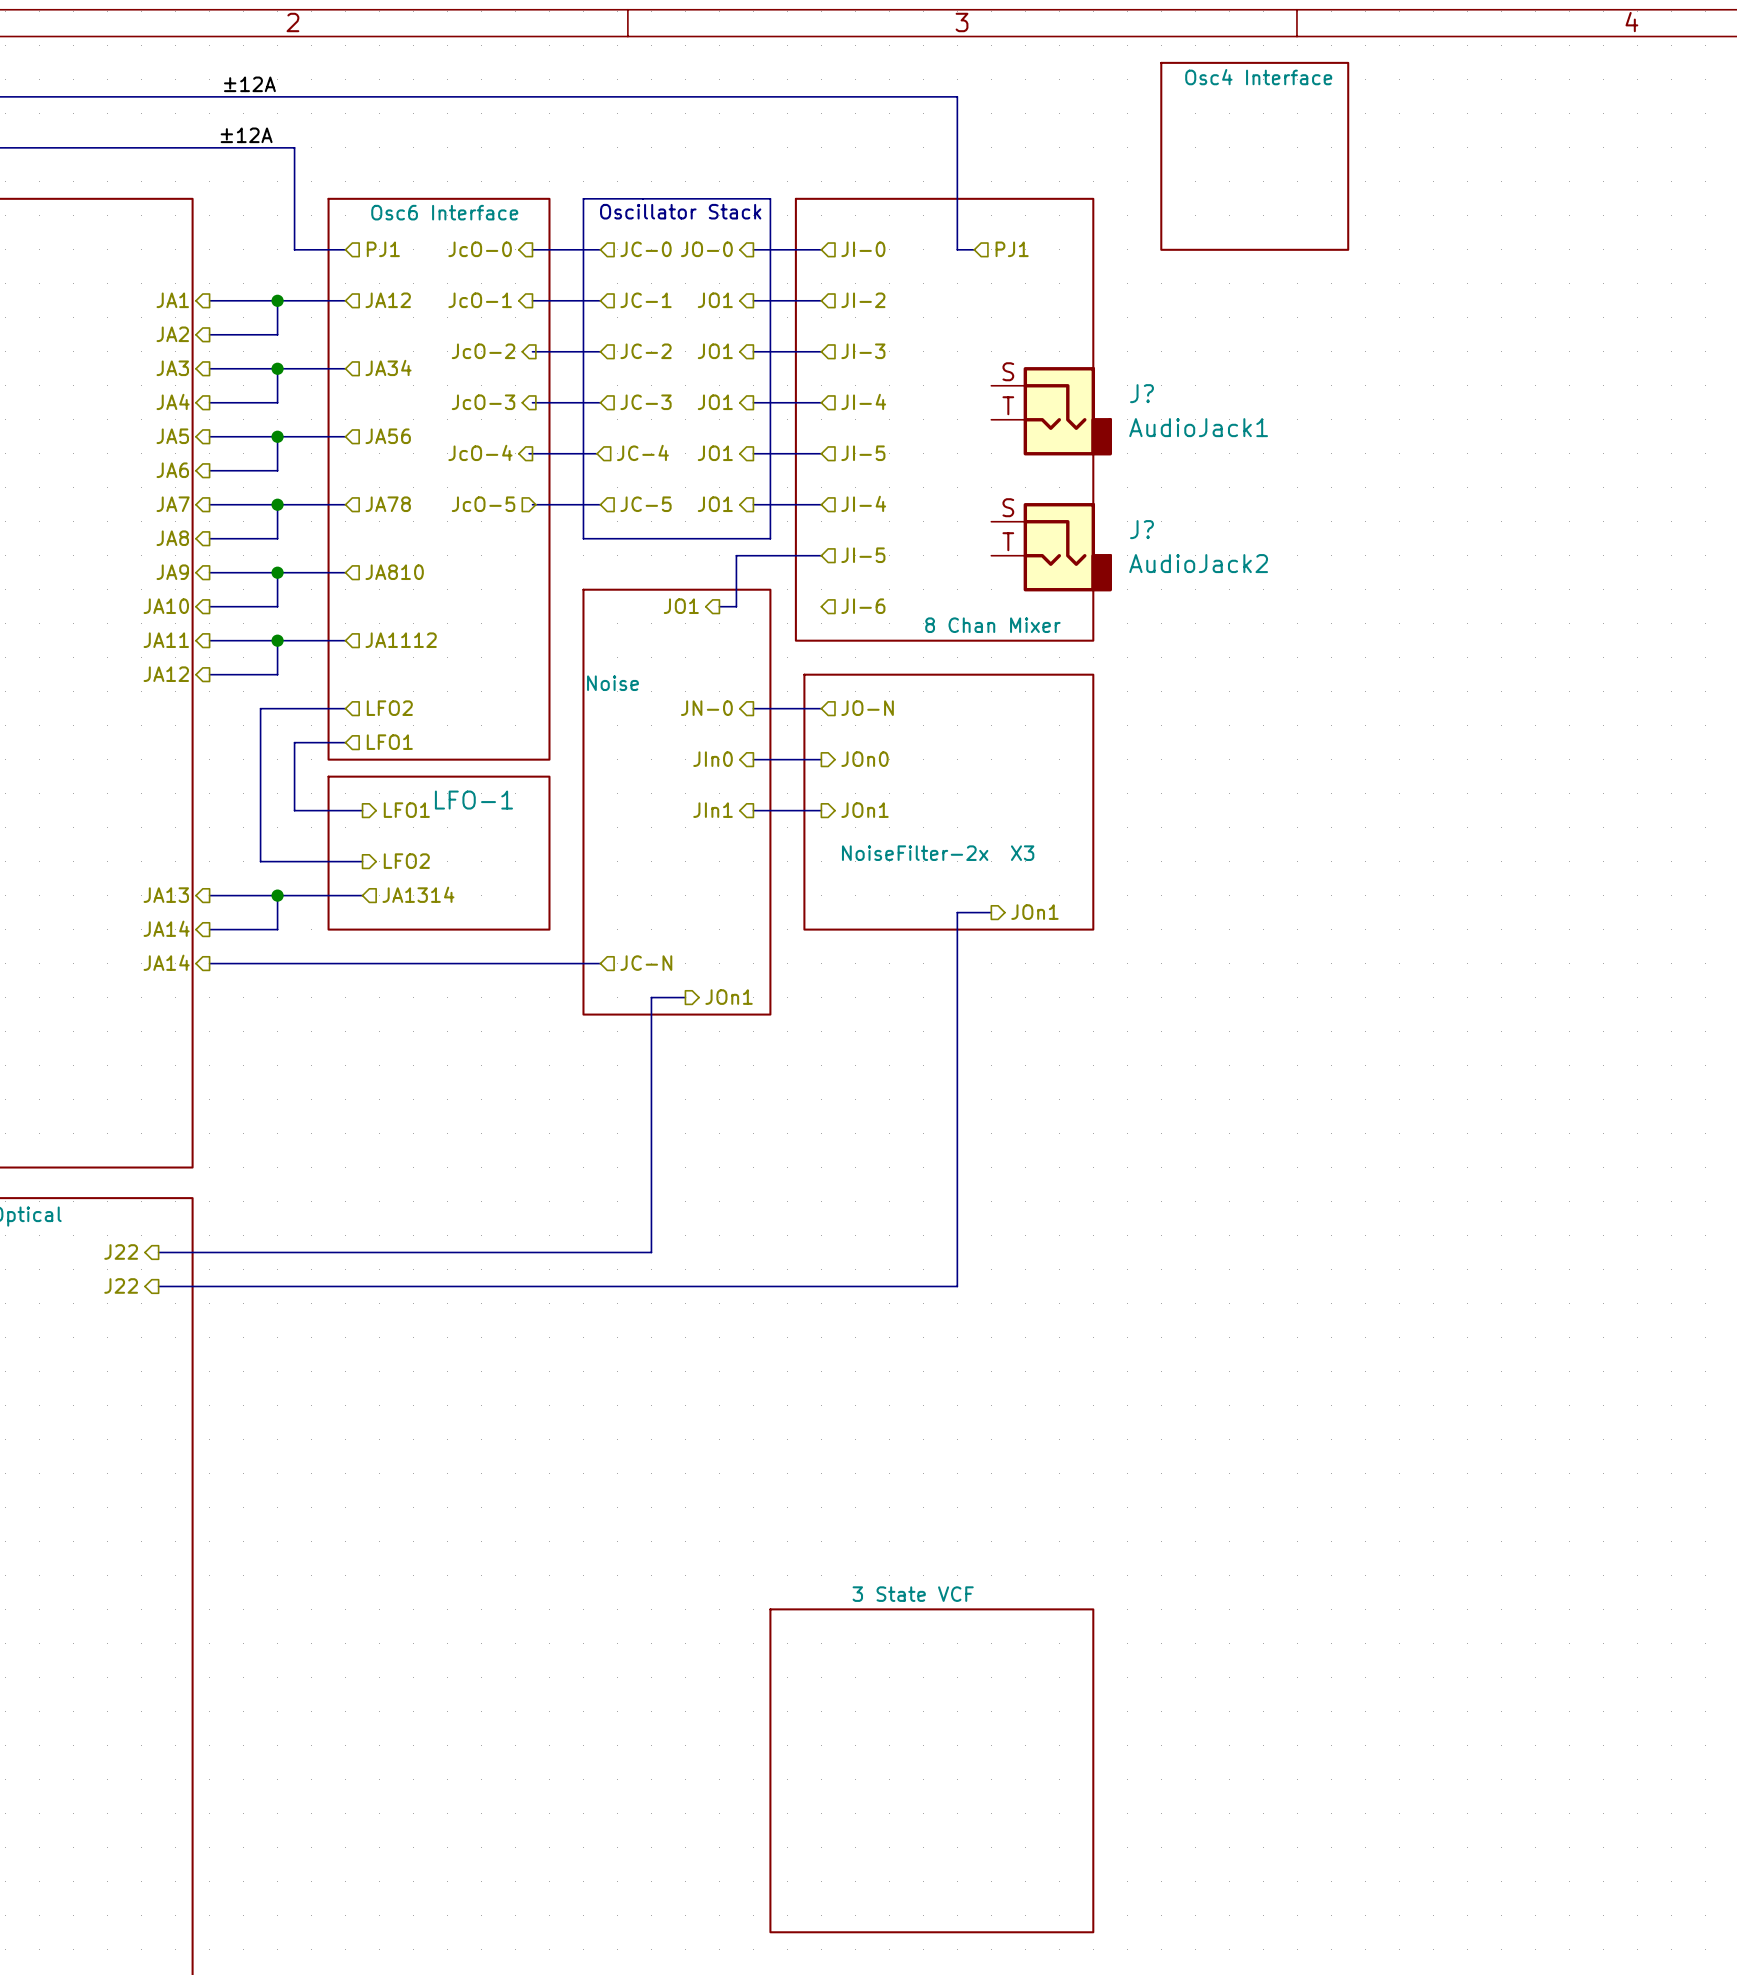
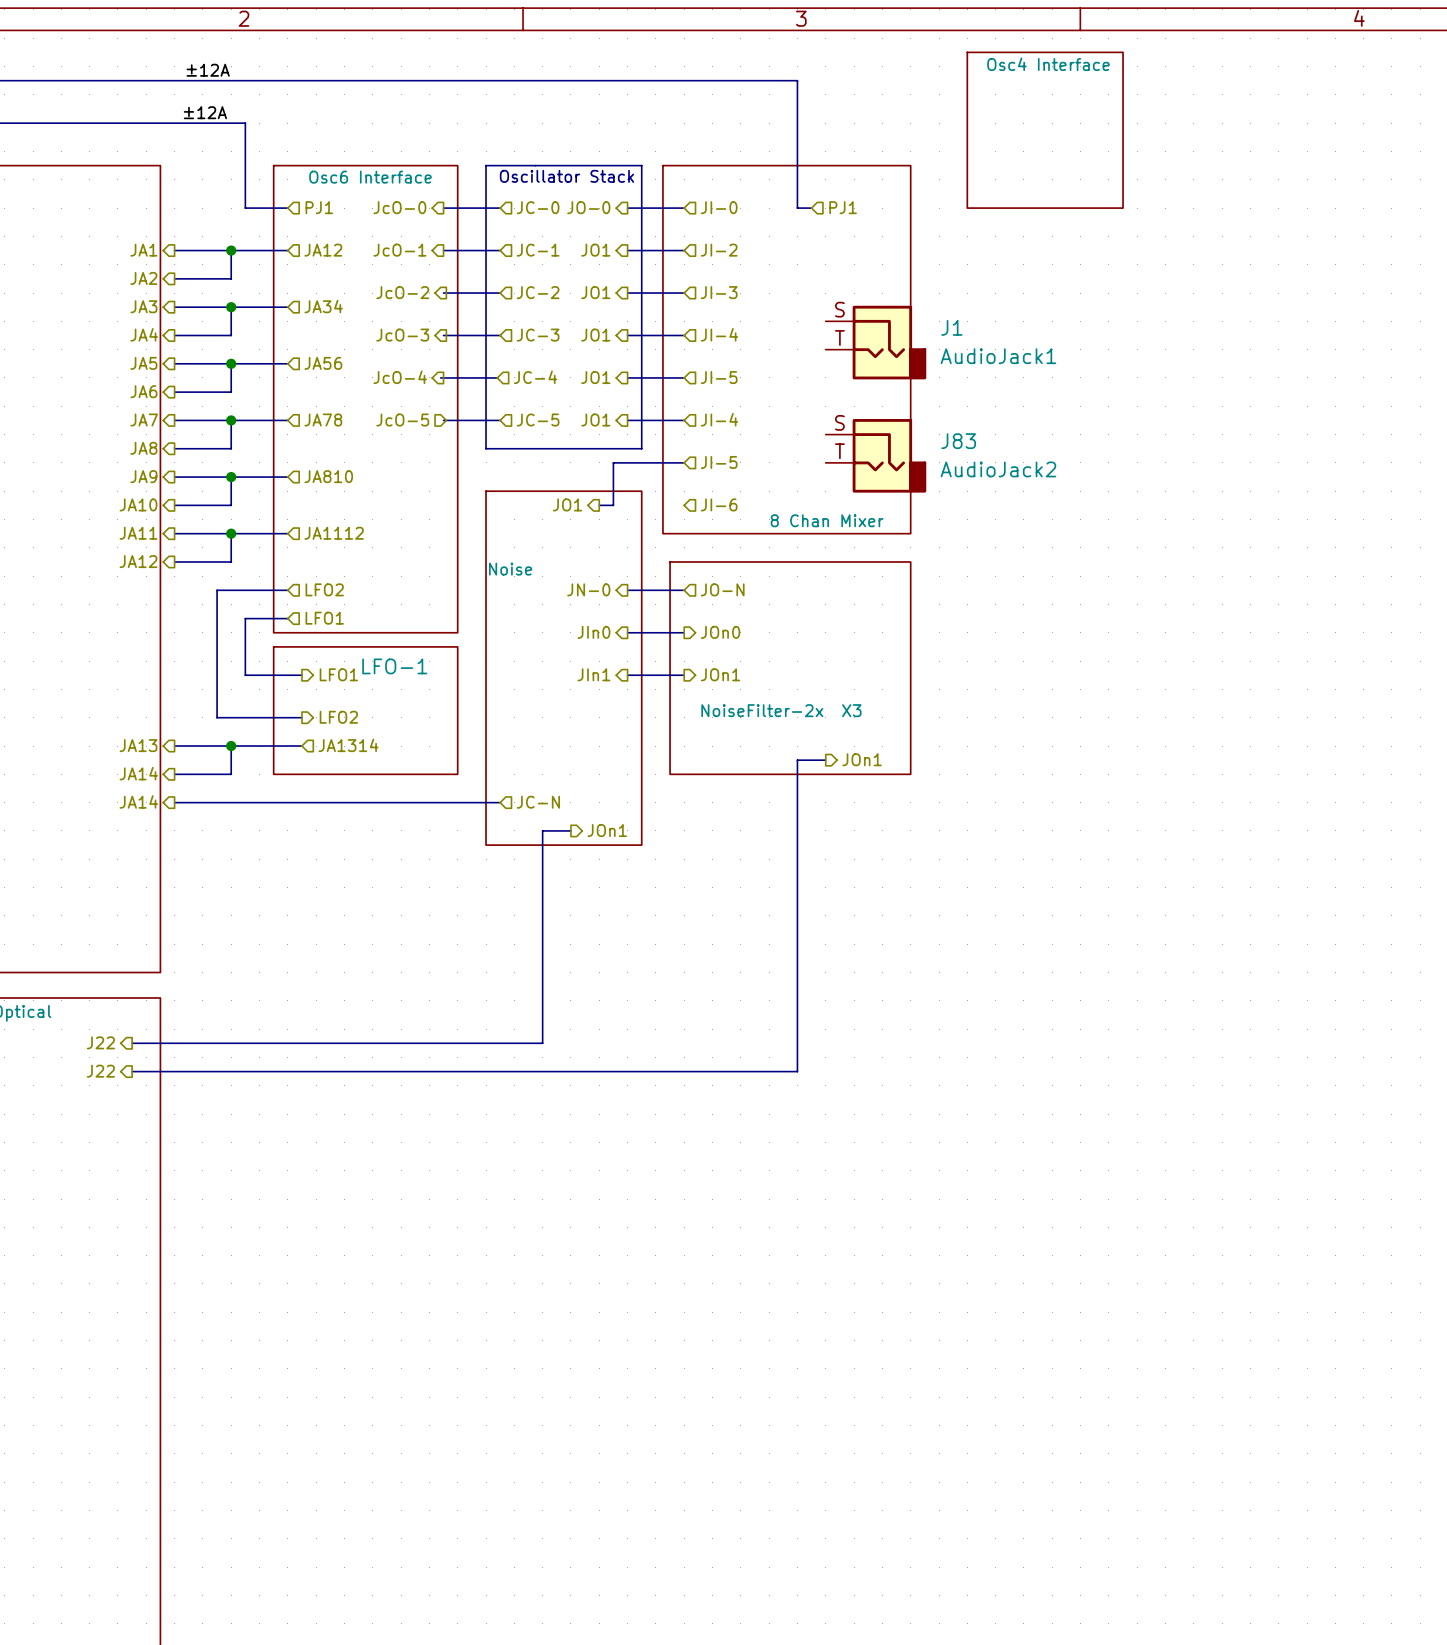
J? name: J? (1141, 393) -> J1 (951, 327)
J? name: J? (1141, 529) -> J83 (958, 441)
sheet 3 State VCF: (931, 1770) -> none

